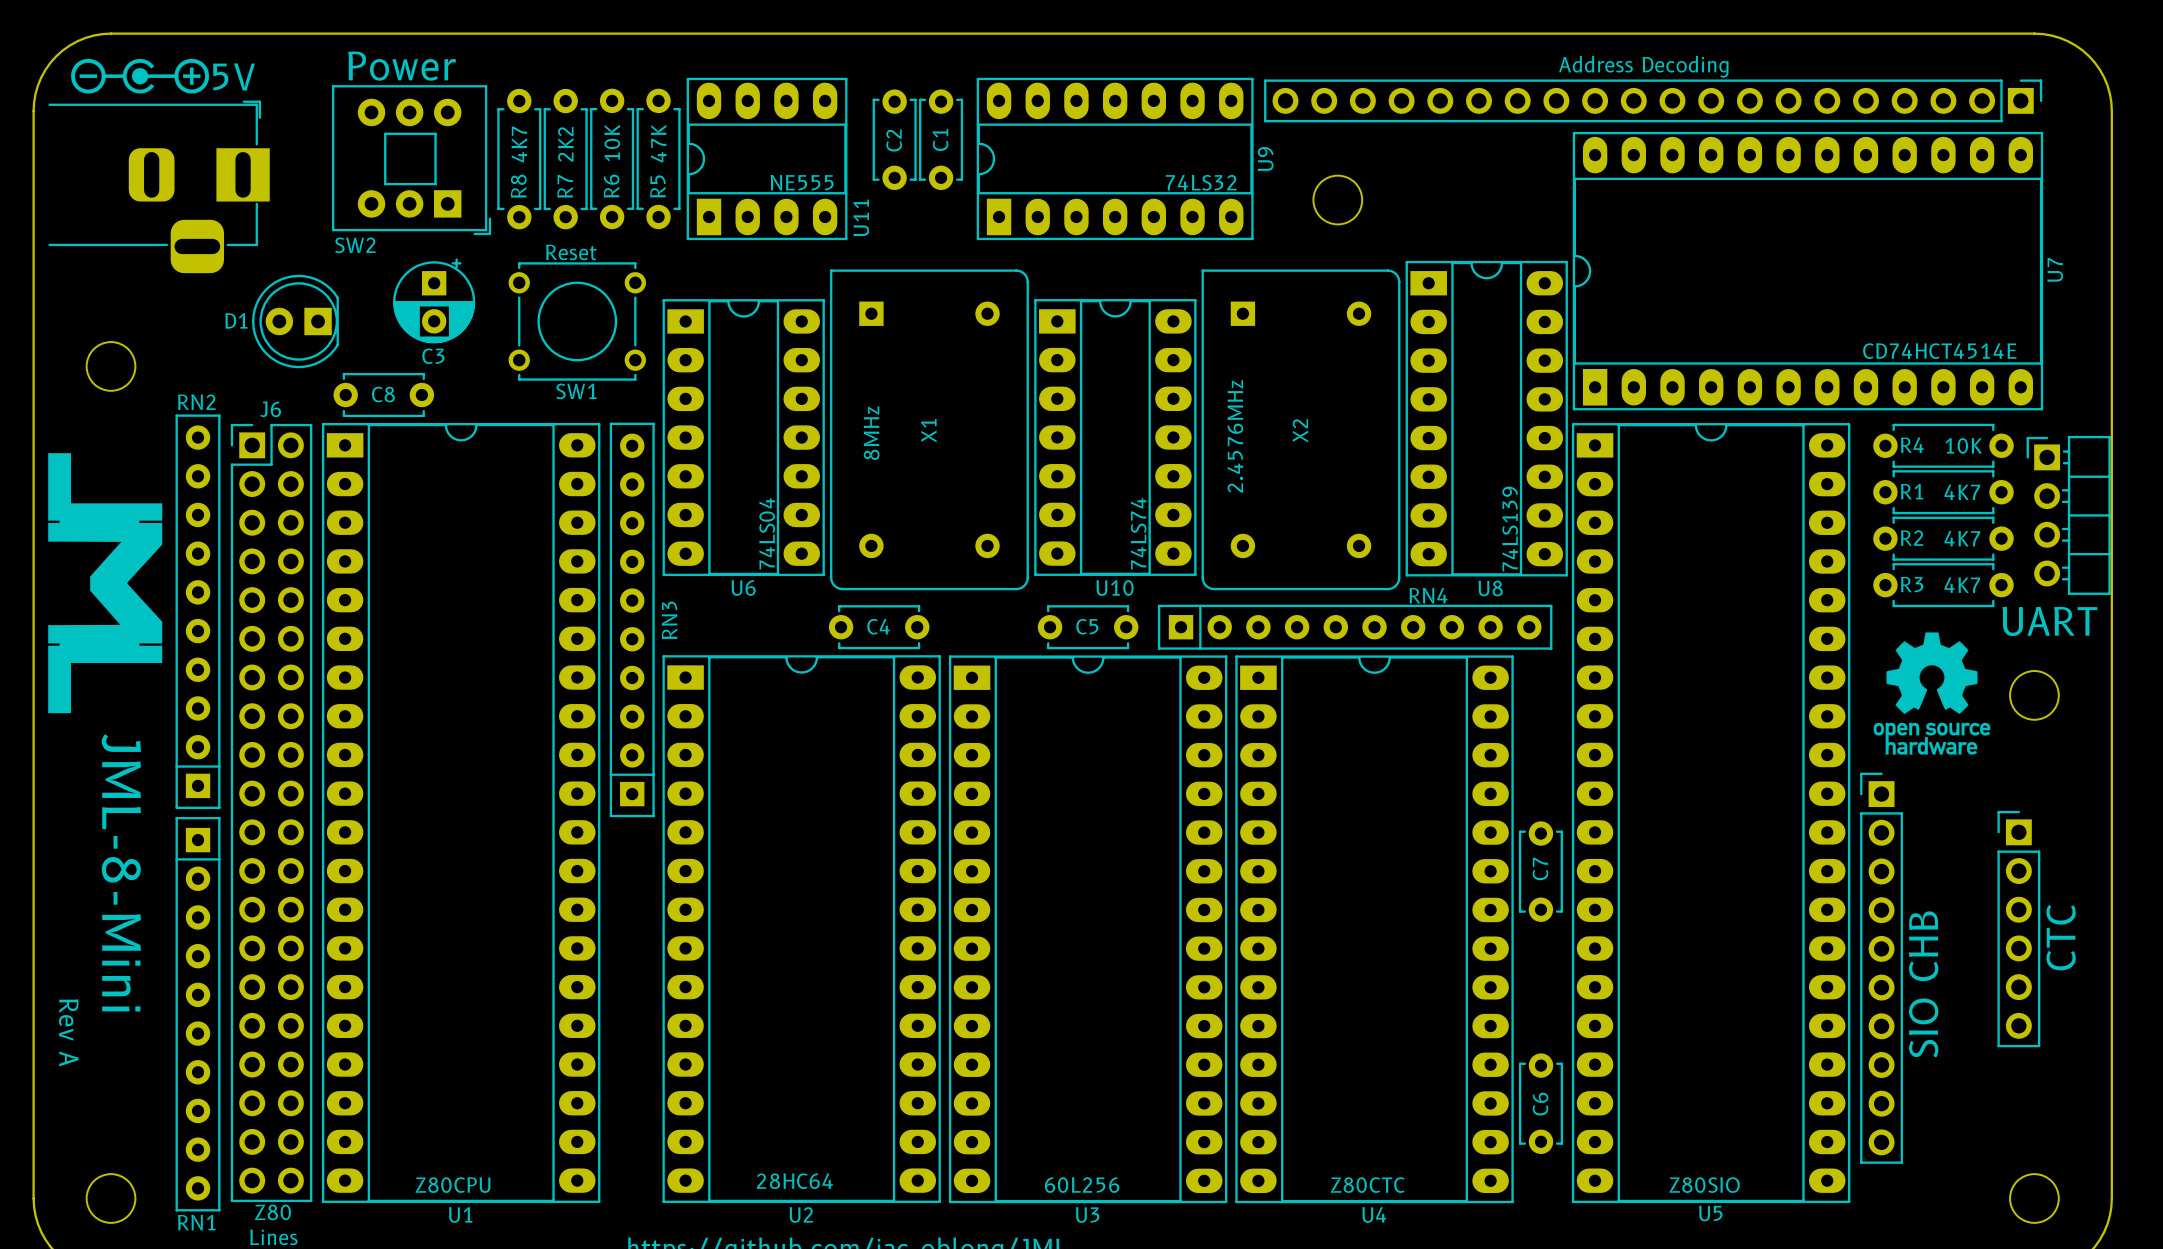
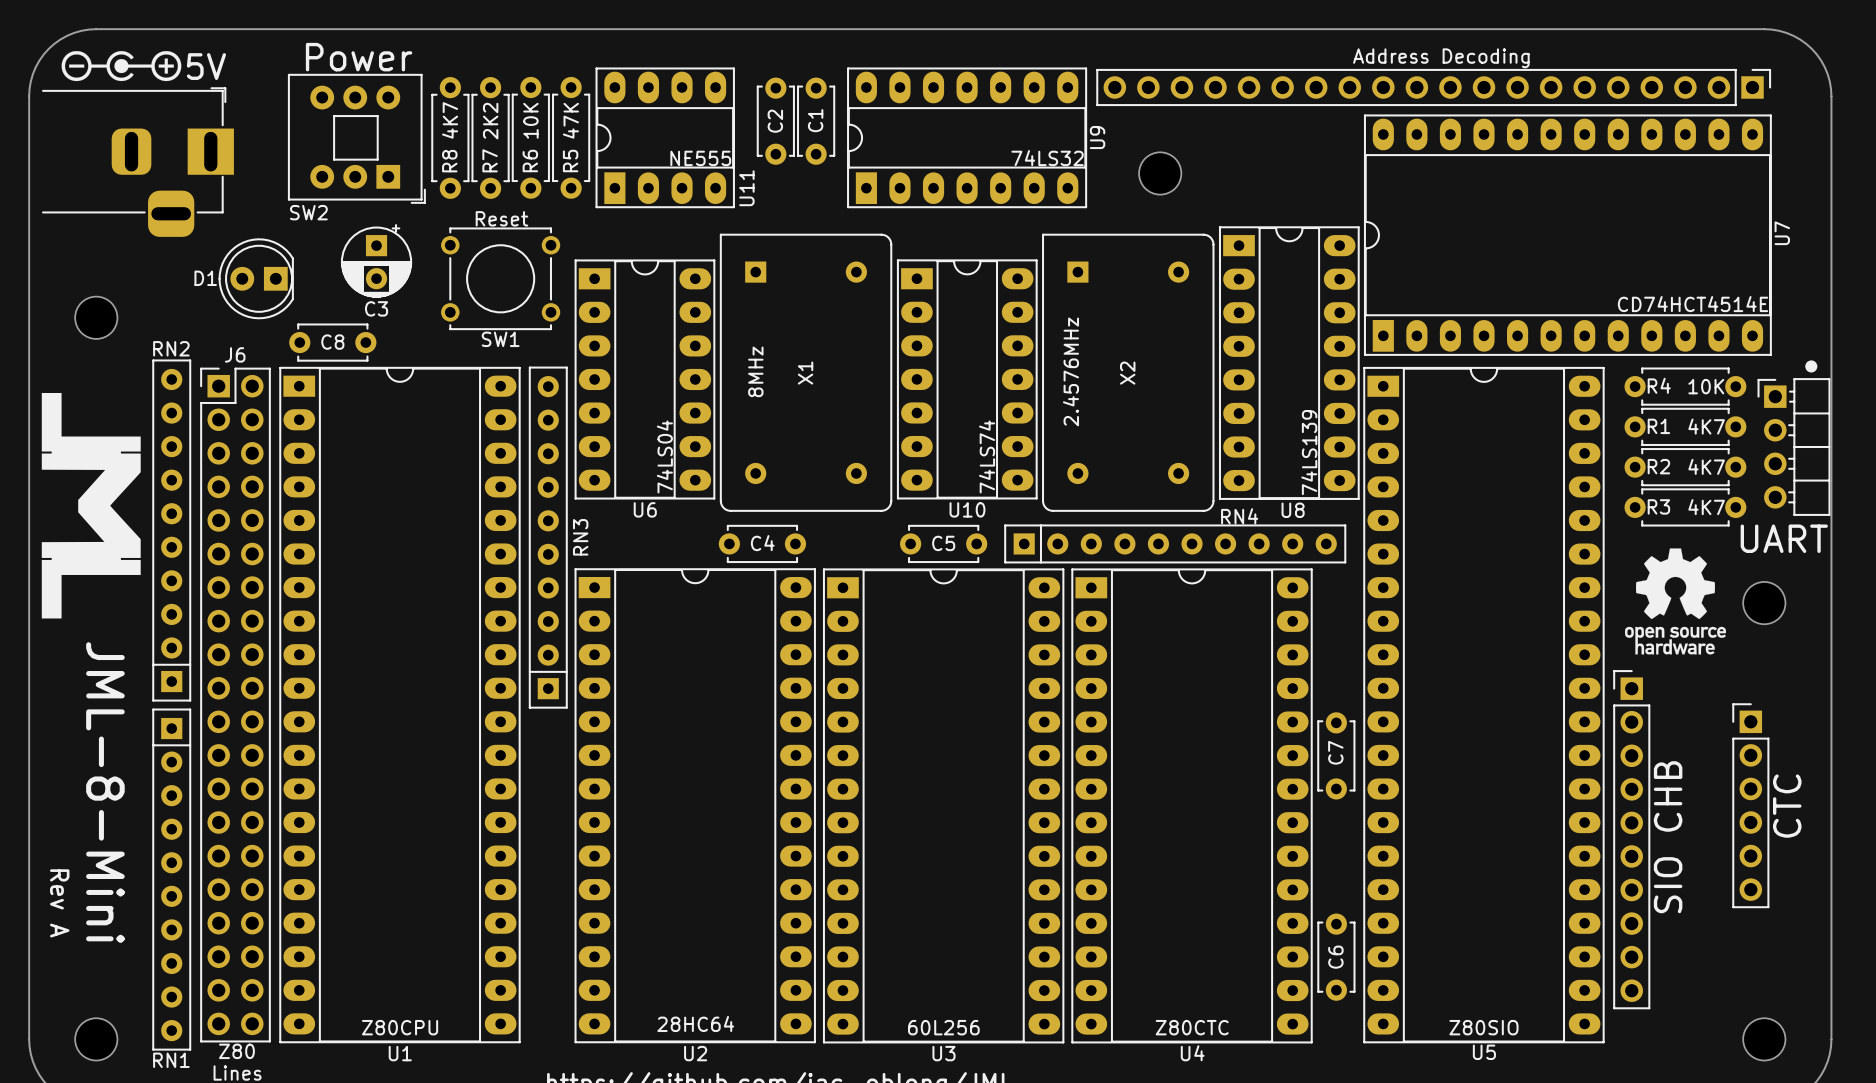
drawing: none -> [1805, 360, 1818, 373]

